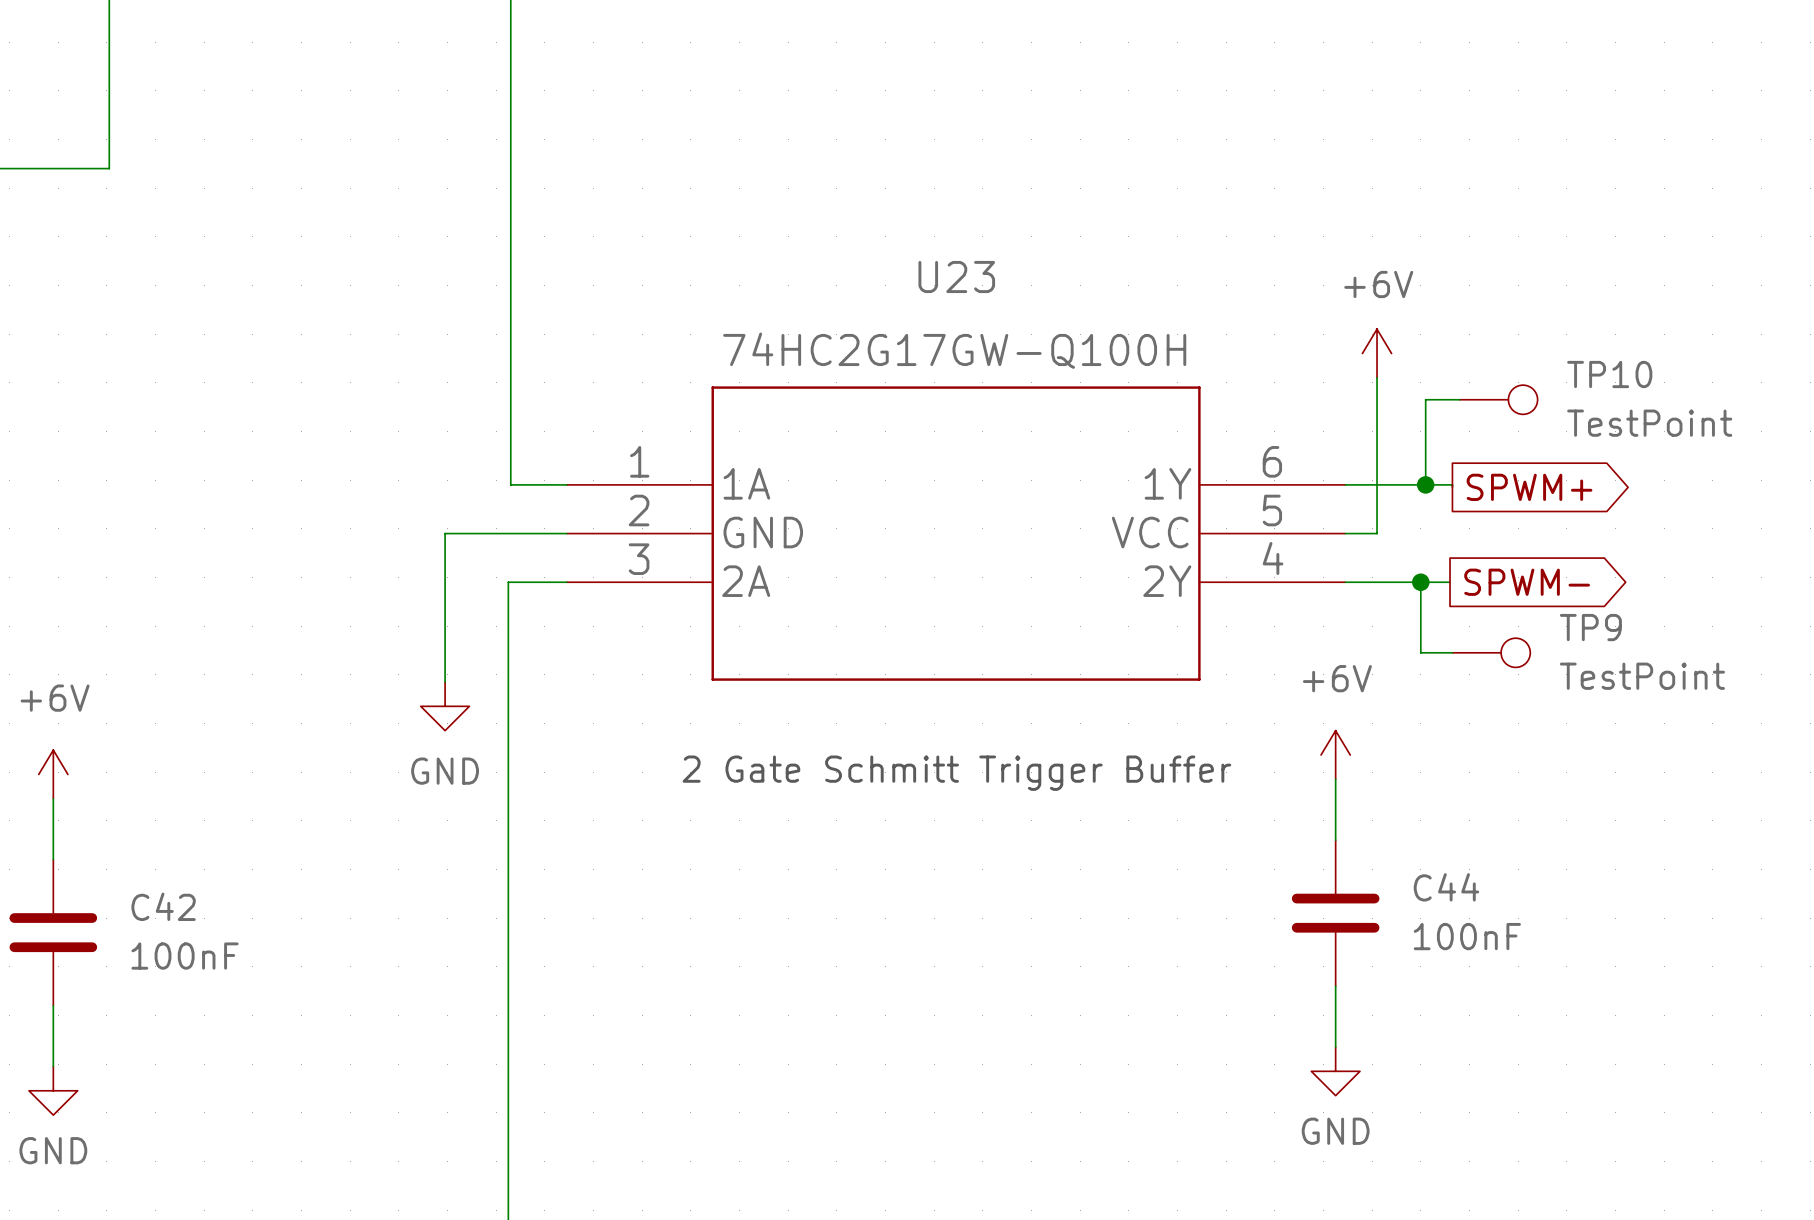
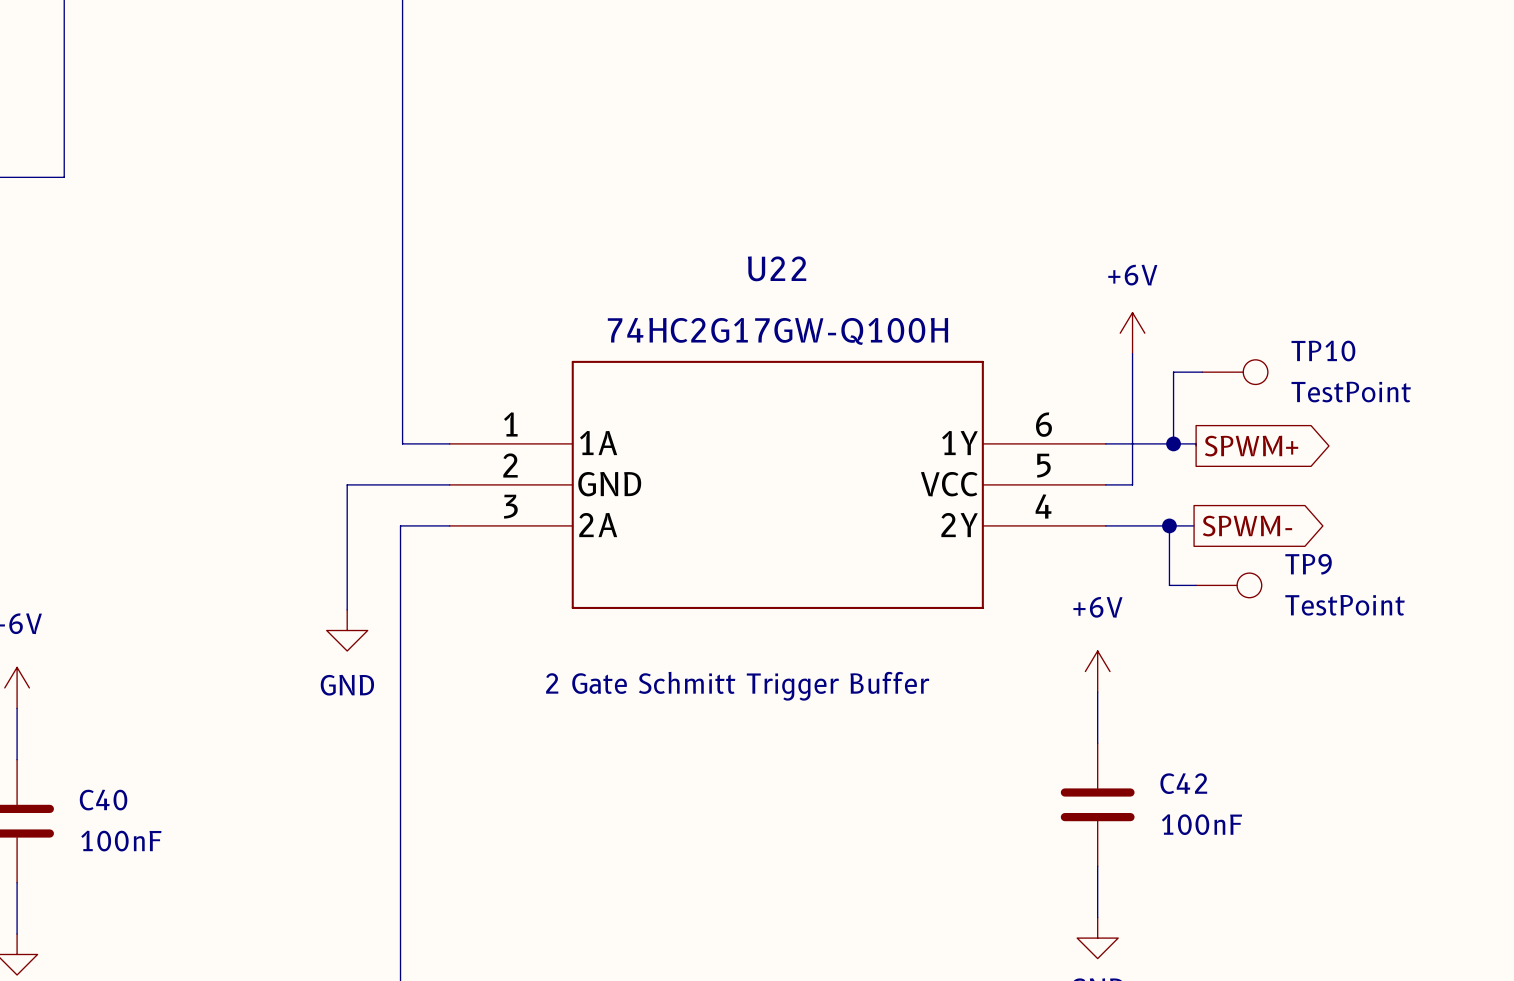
U23 name: U23 (956, 276) -> U22 (777, 268)
C44 name: C44 (1446, 887) -> C42 (1183, 783)
C42 name: C42 (163, 906) -> C40 (103, 800)

